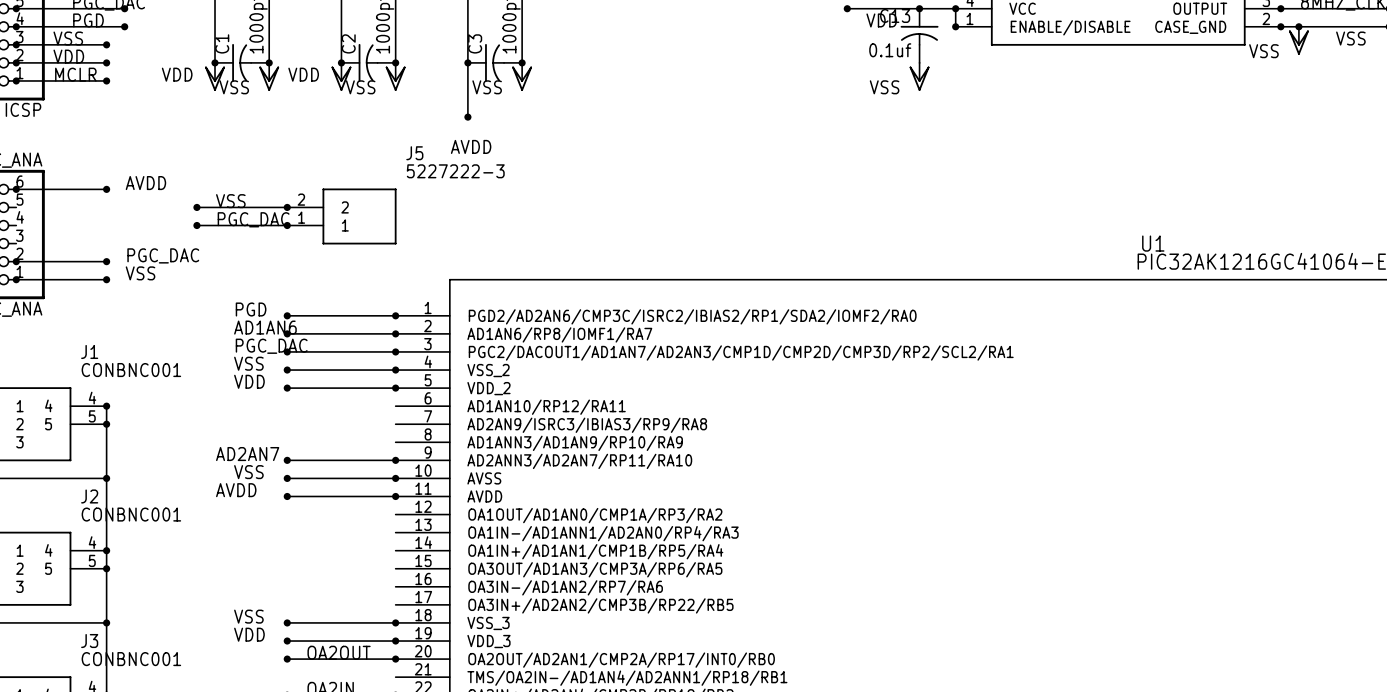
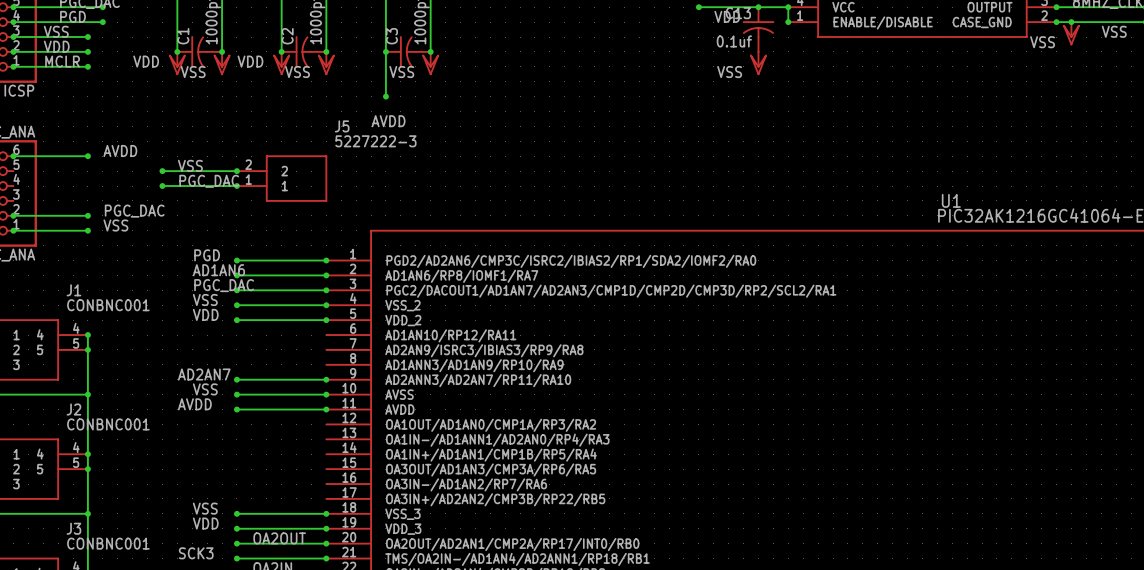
label: none -> SCK3 (196, 553)
wire: none -> (236, 558) (326, 558)
junction: none -> (236, 558)
junction: none -> (326, 558)

